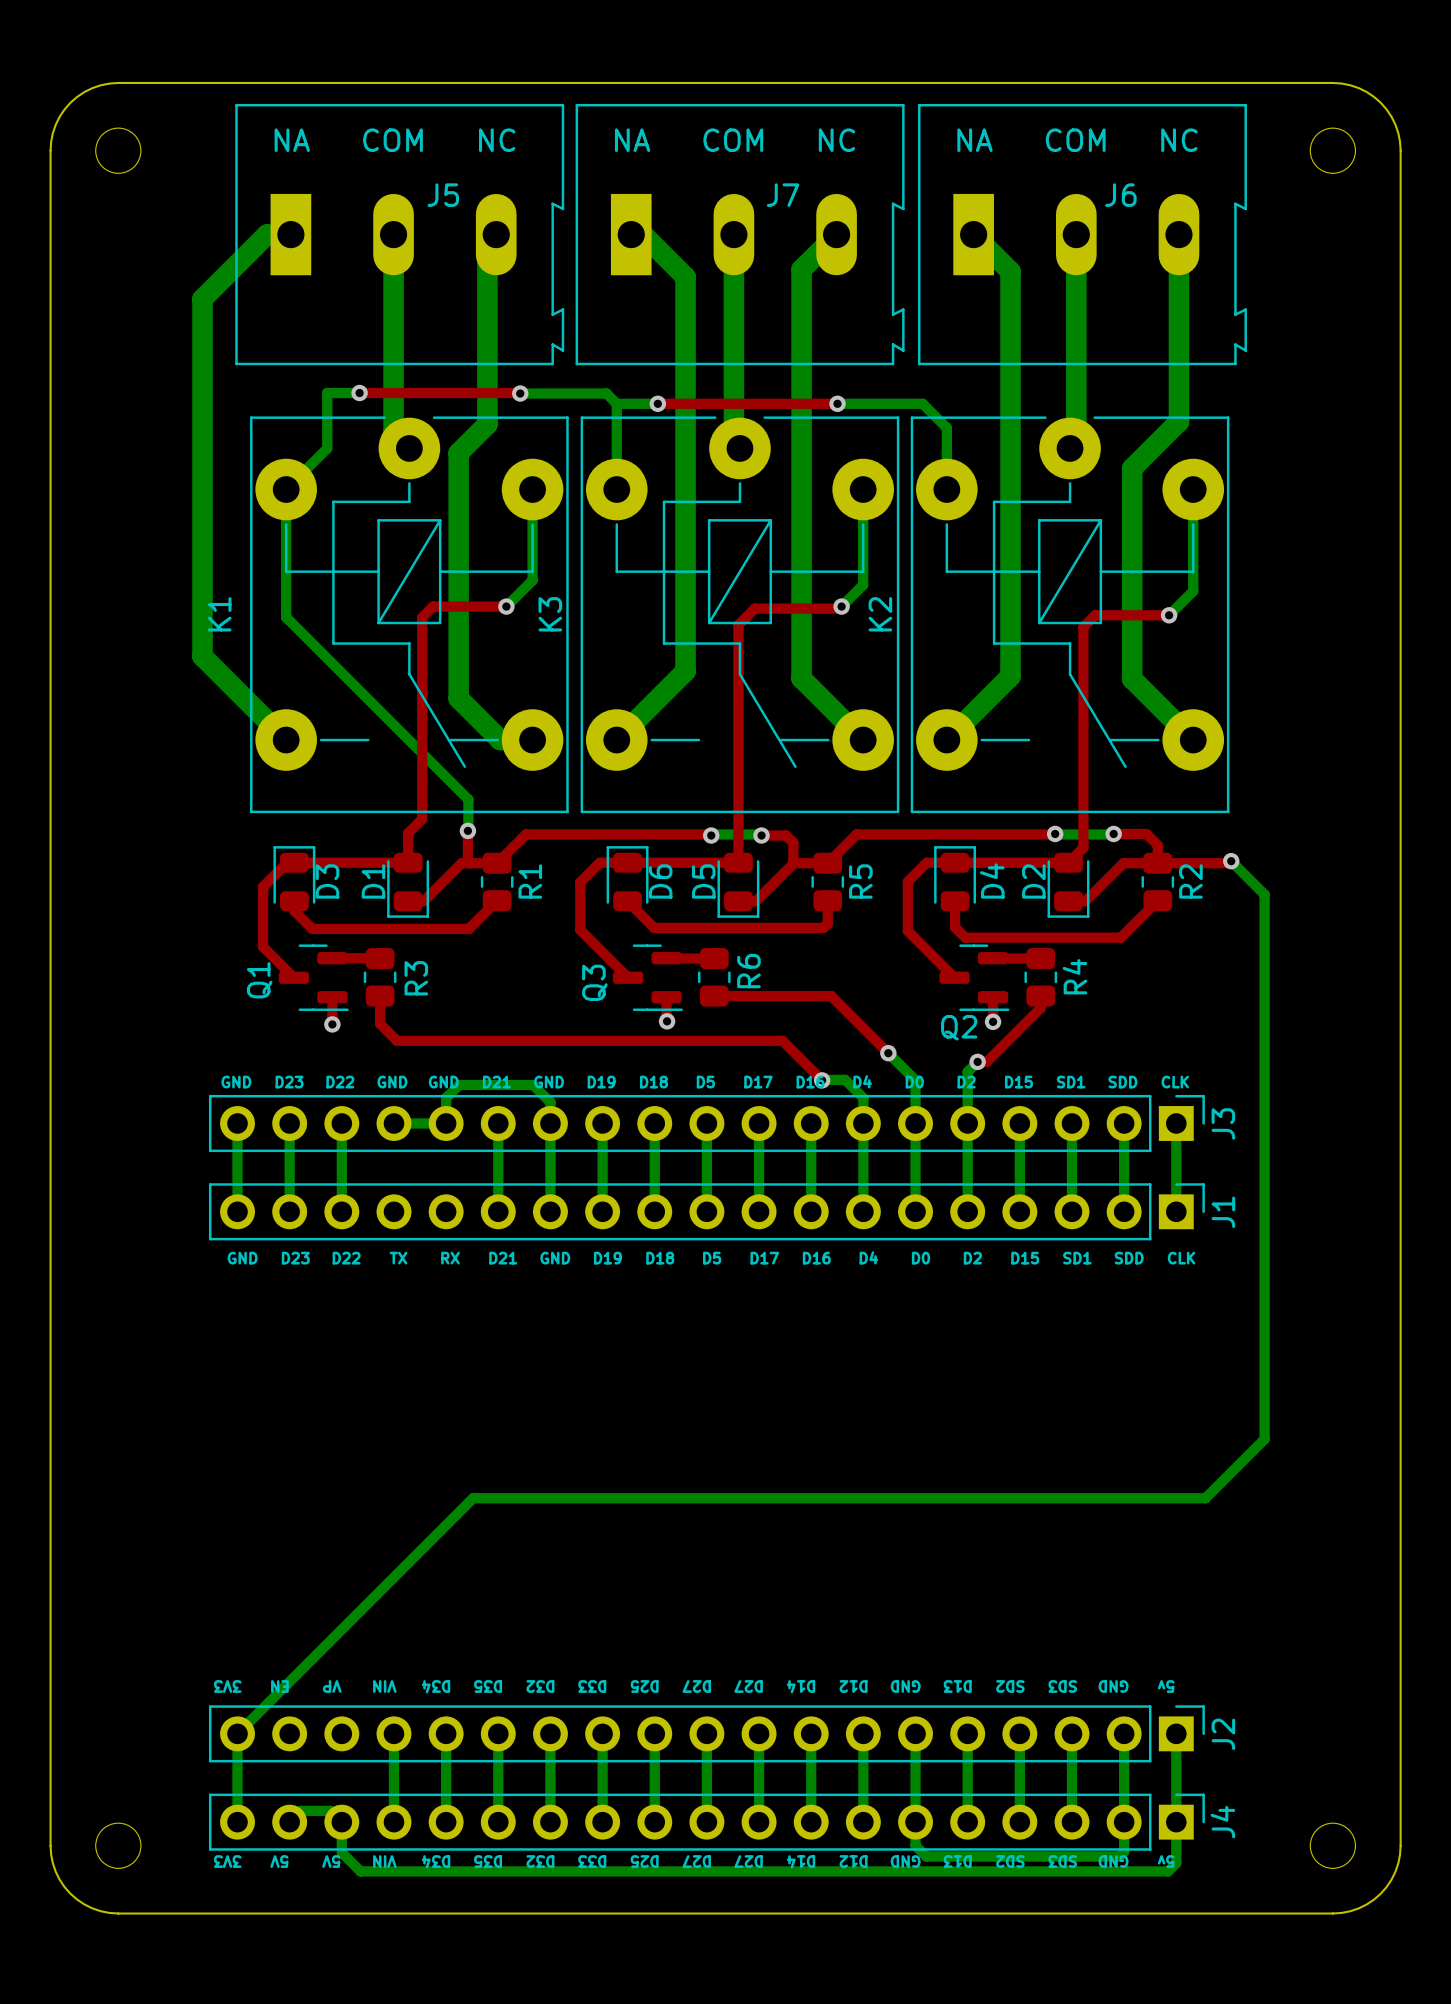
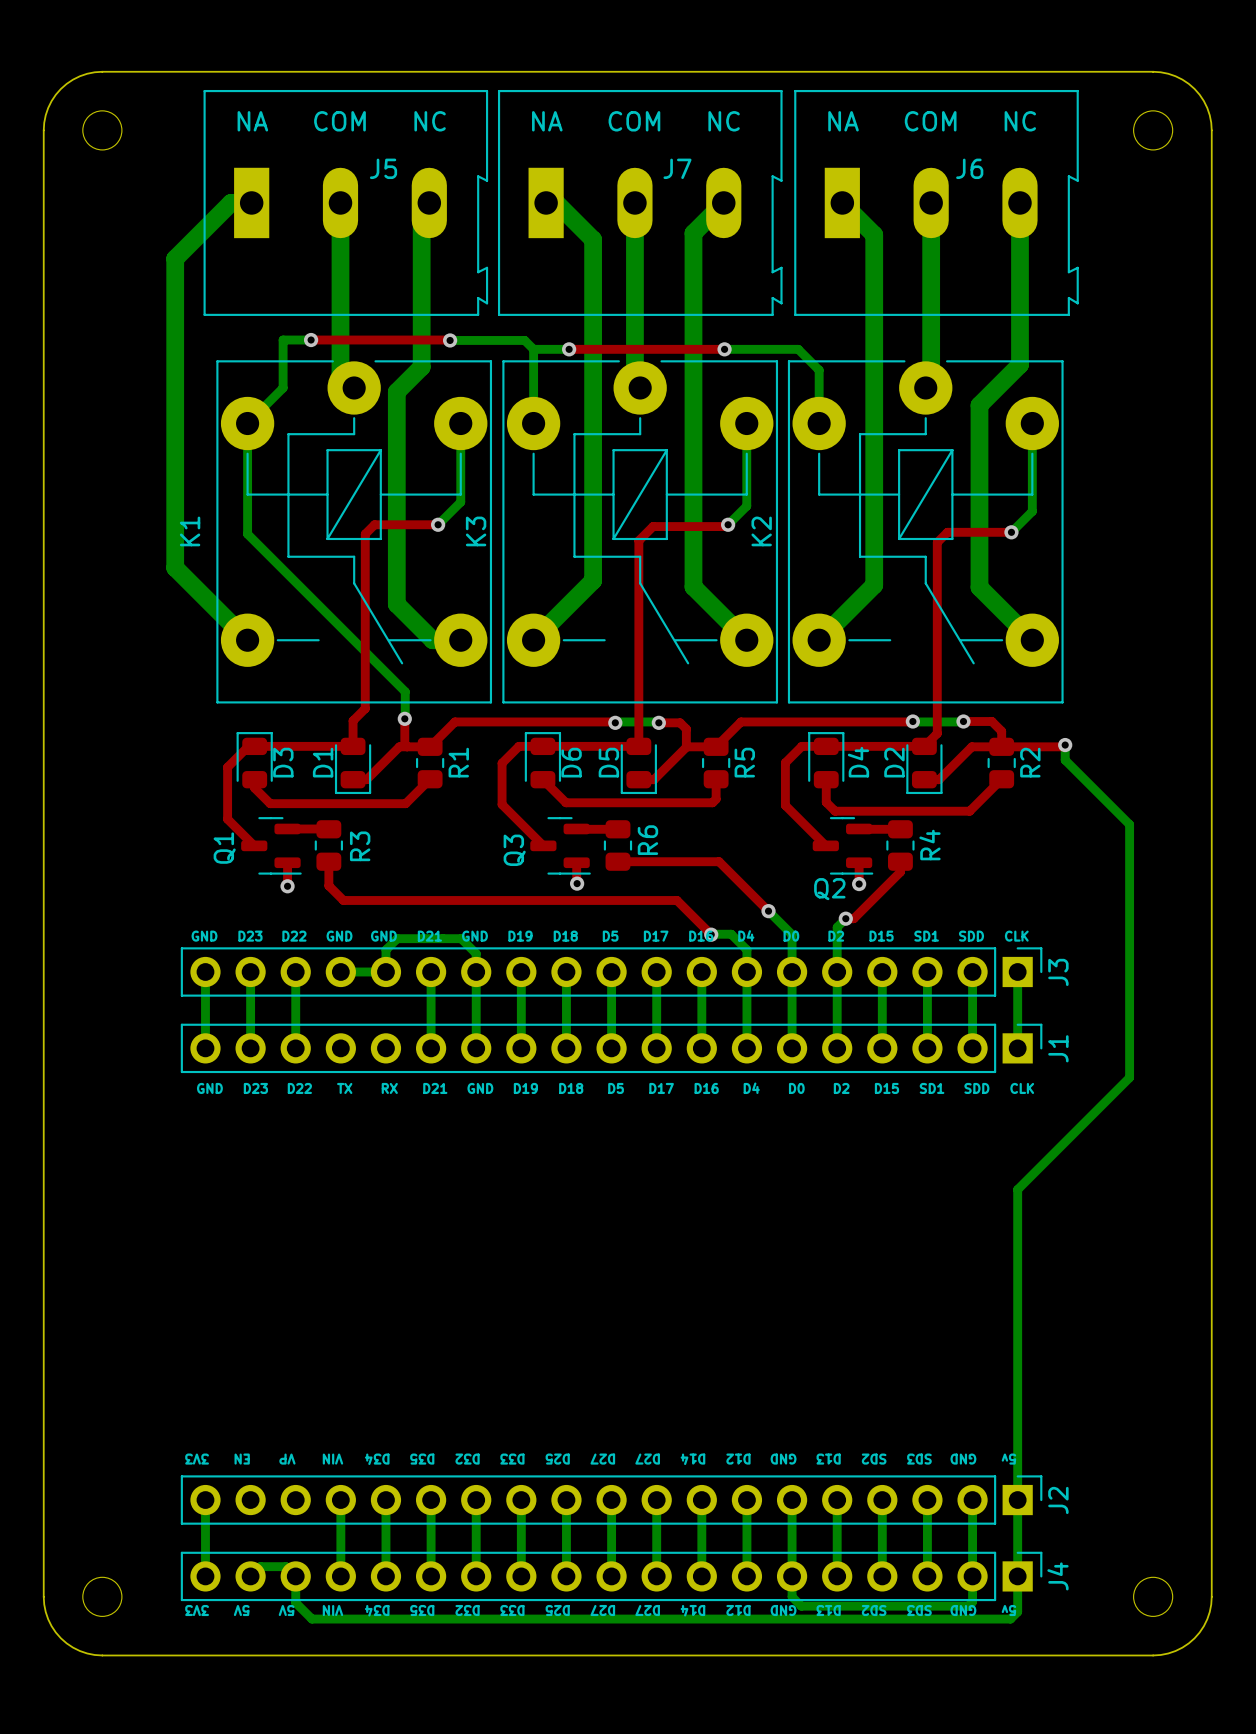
bottom track: (1231, 861) (1264, 894) (1264, 1439) (1205, 1498) (473, 1498) (237, 1733) -> (1065, 745) (1065, 760) (1129, 824) (1129, 1077) (1017, 1189) (1017, 1500)

